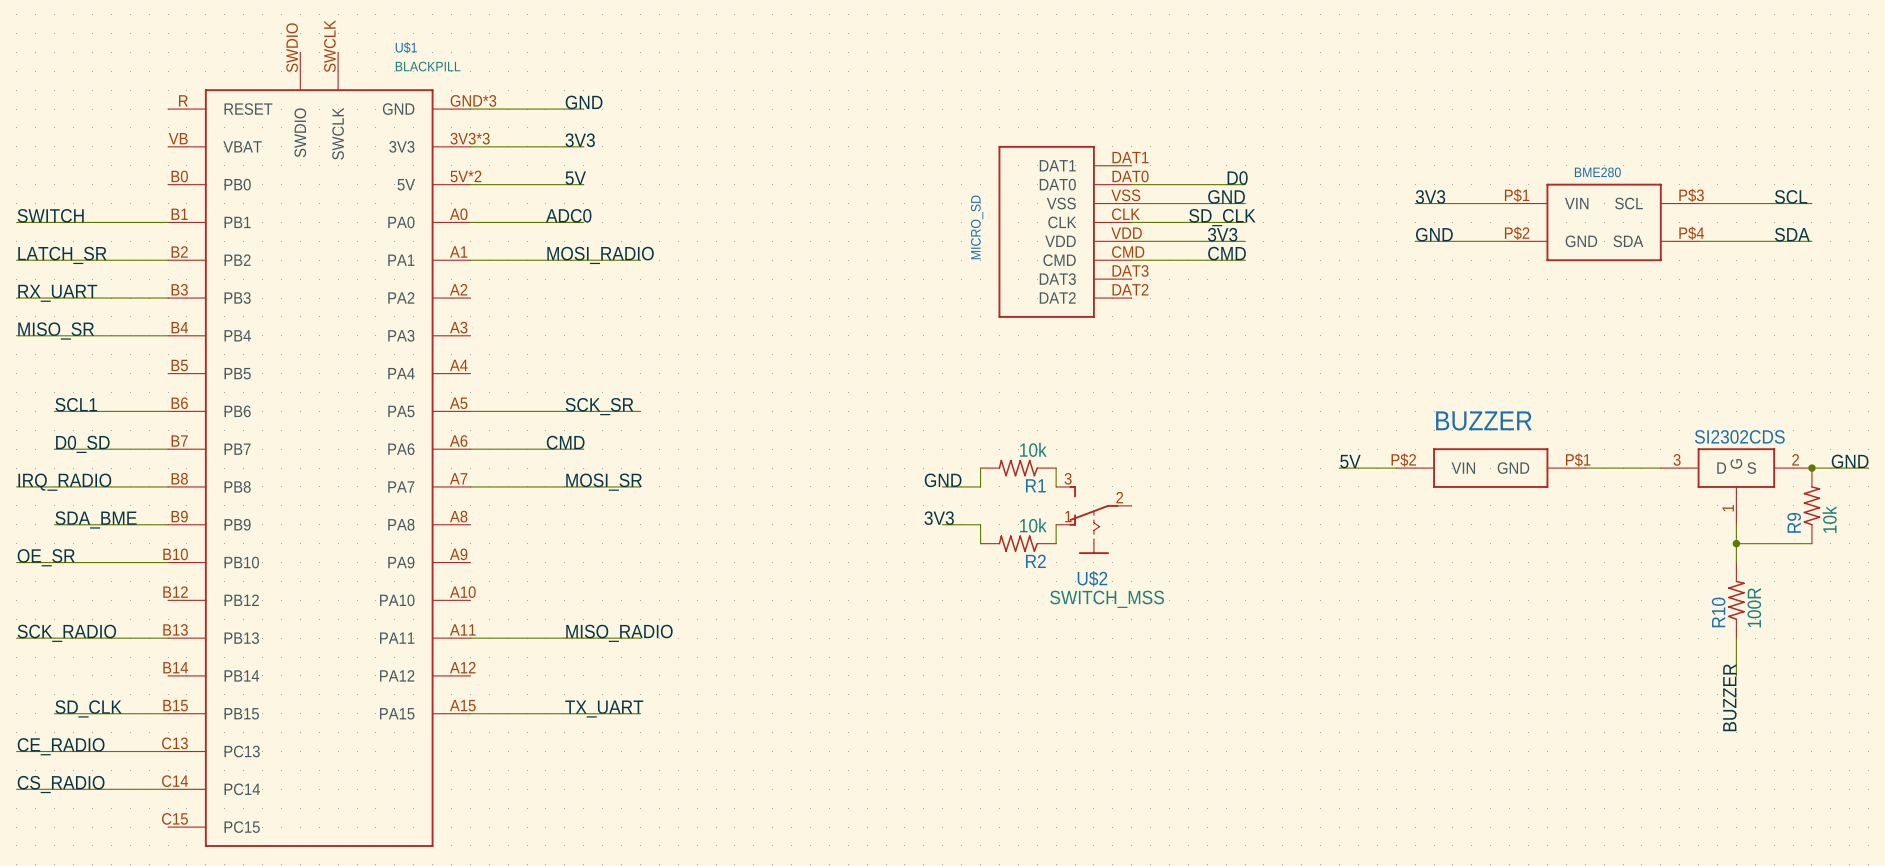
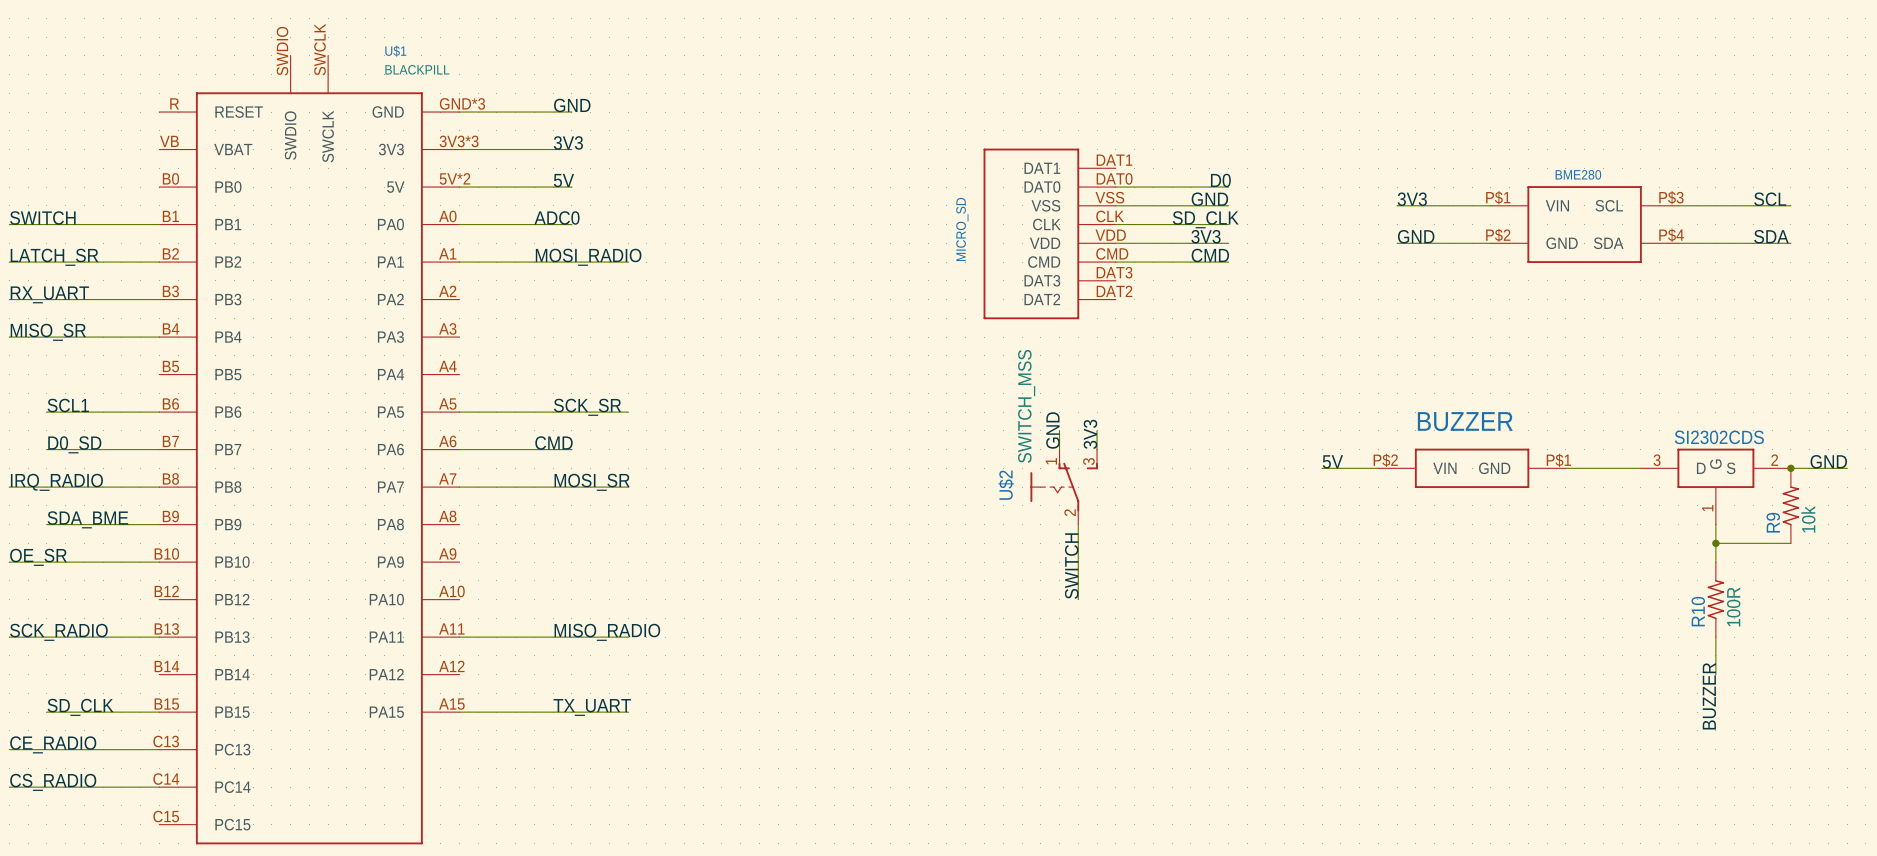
label: none -> 3V3 (1090, 434)
wire: (980, 468) (980, 486) (942, 486) -> none
R1: 10k (1018, 468) -> none
wire: (1056, 468) (1056, 486) -> (1059, 430) (1059, 449)
label rotation: 0° (943, 480) -> 90° counterclockwise (1052, 430)
label position: GND (943, 480) -> GND (1052, 430)
label: 3V3 (939, 518) -> none
U$2 rotation: 0° (1093, 520) -> 90° clockwise (1064, 487)
wire: (942, 524) (980, 524) (980, 543) -> none
wire: (1056, 524) (1056, 543) -> (1097, 430) (1097, 449)
R2: 10k (1018, 543) -> none
label: none -> SWITCH (1071, 566)
U$2 value position: SWITCH_MSS (1107, 599) -> SWITCH_MSS (1026, 406)

